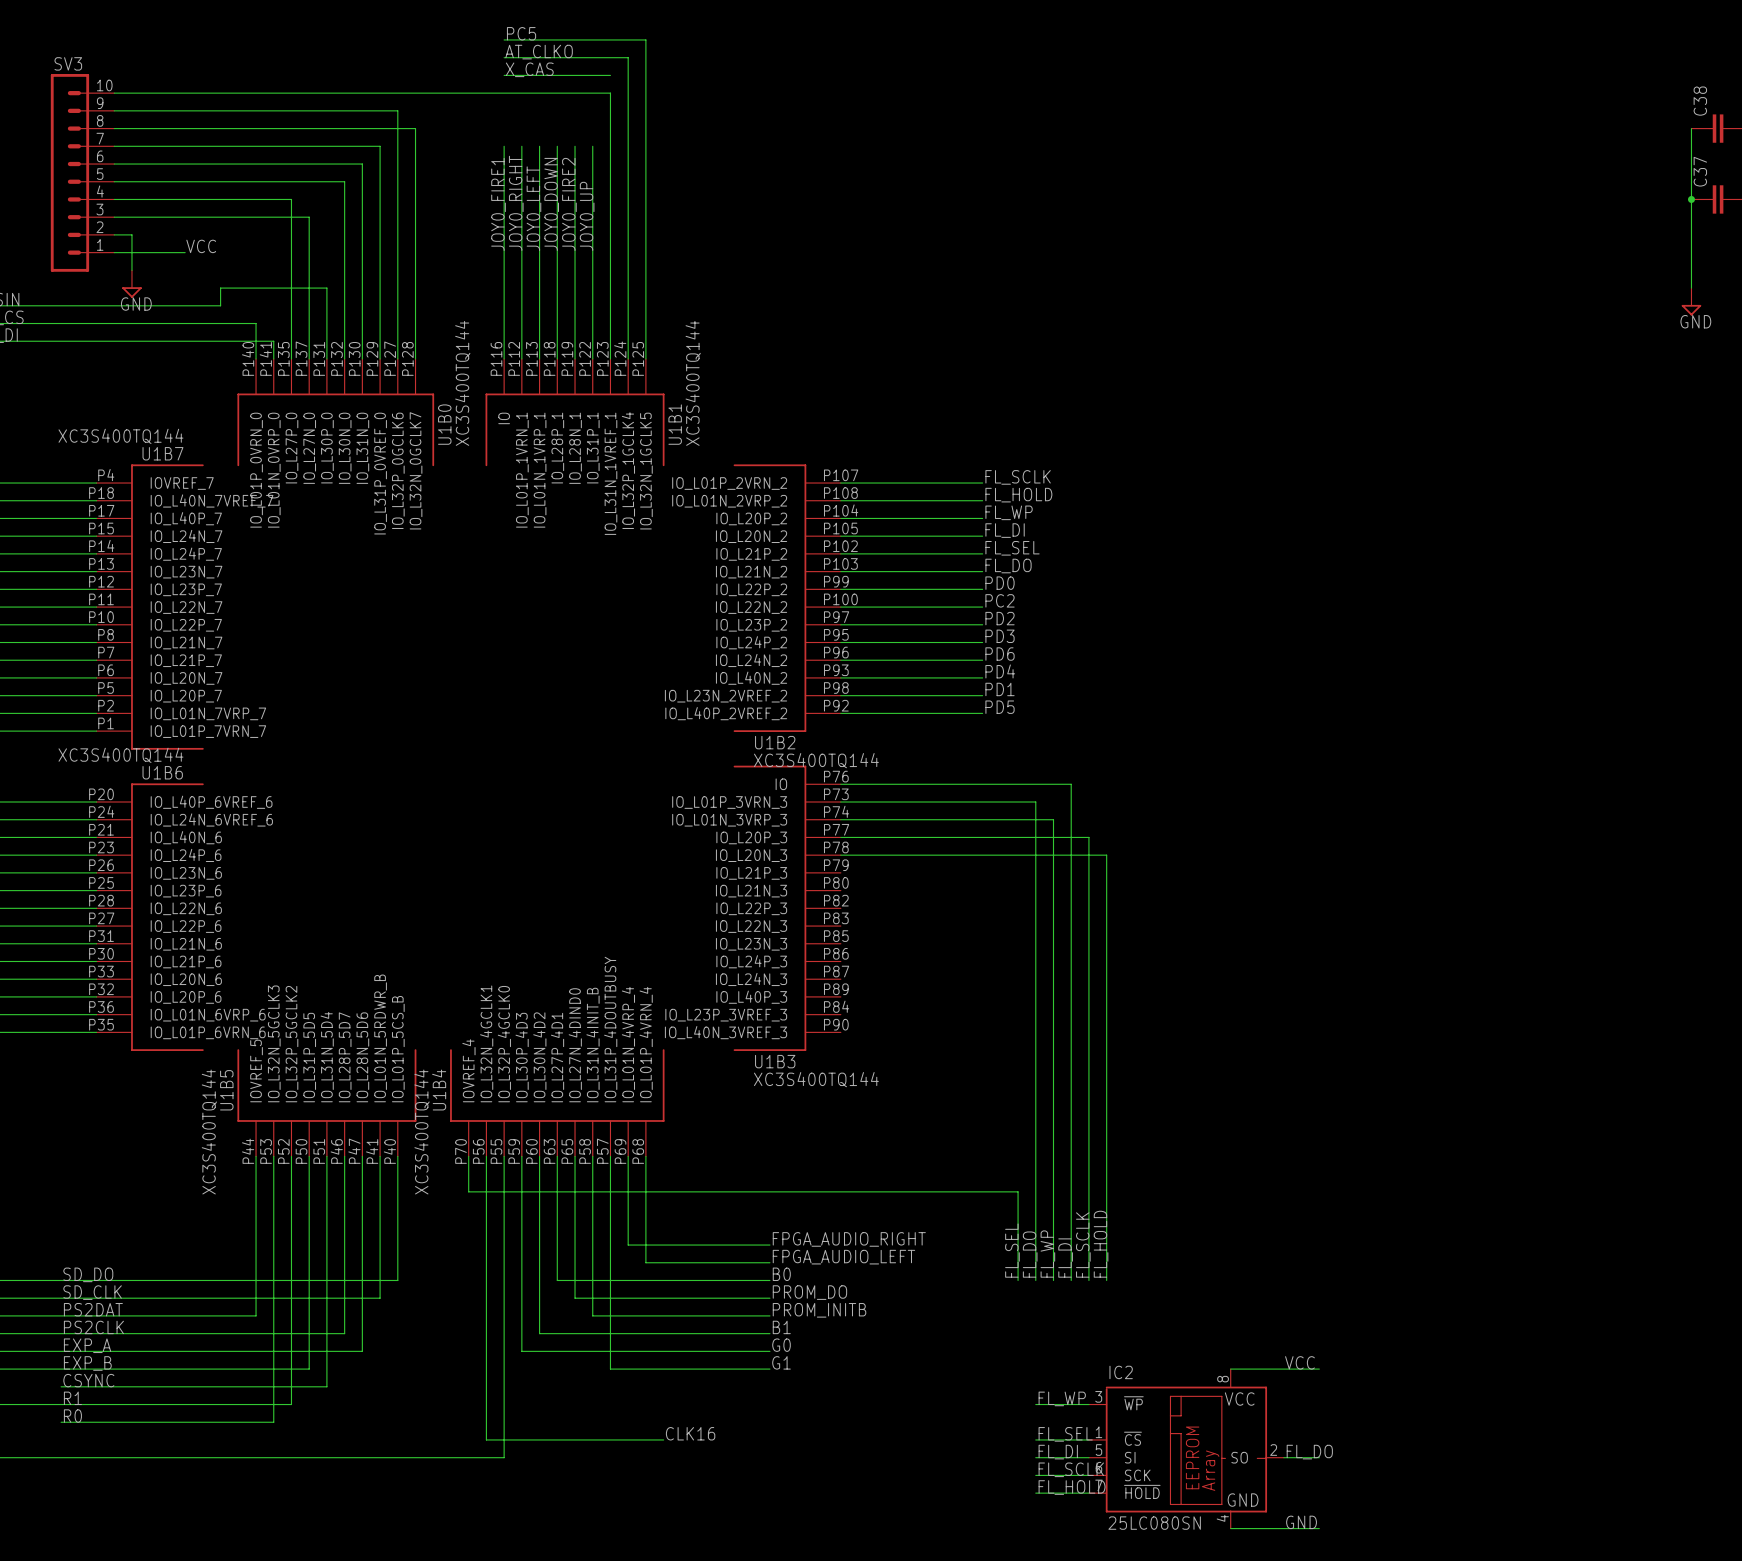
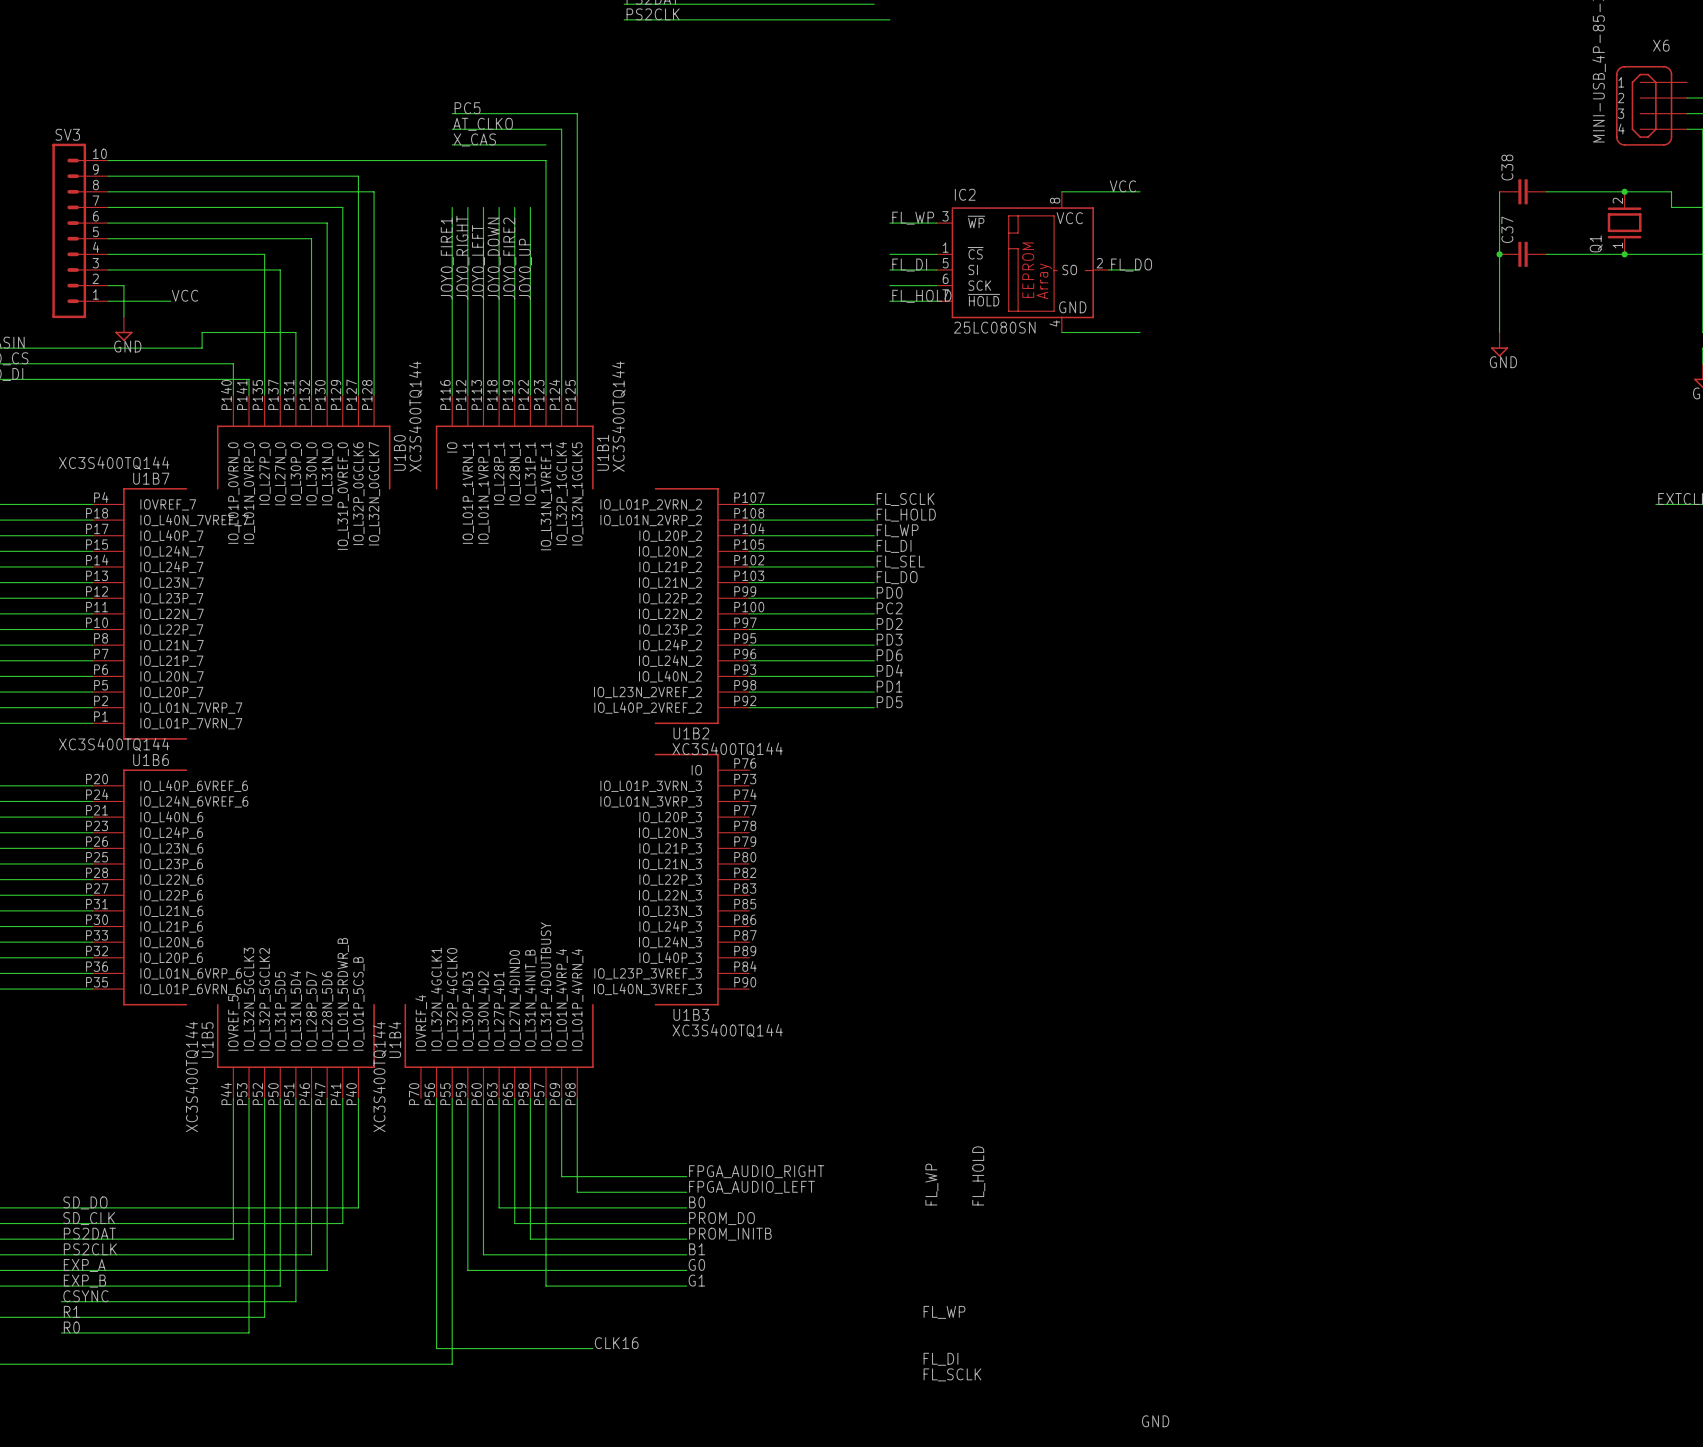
label: none -> VCC (1122, 186)
wire: none -> (1061, 191) (1140, 191)
label: none -> FL_WP (913, 218)
wire: none -> (889, 223) (936, 223)
wire: none -> (889, 254) (936, 254)
label: none -> FL_DI (909, 265)
label: none -> FL_DO (1131, 265)
wire: none -> (889, 269) (936, 269)
wire: none -> (1108, 269) (1140, 269)
wire: none -> (889, 285) (936, 285)
label: none -> FL_HOLD (921, 296)
wire: none -> (889, 301) (936, 301)
wire: none -> (1061, 332) (1140, 332)
wire: (840, 784) (1071, 784) (1071, 1280) -> none
wire: (840, 802) (1035, 802) (1035, 1280) -> none
wire: (840, 819) (1053, 819) (1053, 1280) -> none
wire: (840, 837) (1088, 837) (1088, 1280) -> none
wire: (840, 855) (1106, 855) (1106, 1280) -> none
wire: (468, 1156) (468, 1191) (1018, 1191) (1018, 1280) -> none
label: FL_SCLK (1083, 1245) -> none
label: FL_SEL (1012, 1250) -> none
label: FL_DO (1030, 1254) -> none
label: FL_DI (1065, 1258) -> none
label: VCC (1299, 1362) -> none
wire: (1230, 1369) (1319, 1369) -> none
wire: (1035, 1404) (1088, 1404) -> none
label: FL_SEL (1065, 1434) -> none
wire: (1035, 1439) (1088, 1439) -> none
IC2 position: (1186, 1448) -> (1022, 262)
label: FL_DO (1309, 1452) -> none
wire: (1035, 1457) (1088, 1457) -> none
wire: (1283, 1457) (1319, 1457) -> none
wire: (1035, 1475) (1088, 1475) -> none
label: FL_HOLD (1072, 1487) -> none
wire: (1035, 1493) (1088, 1493) -> none
wire: (1230, 1528) (1319, 1528) -> none

